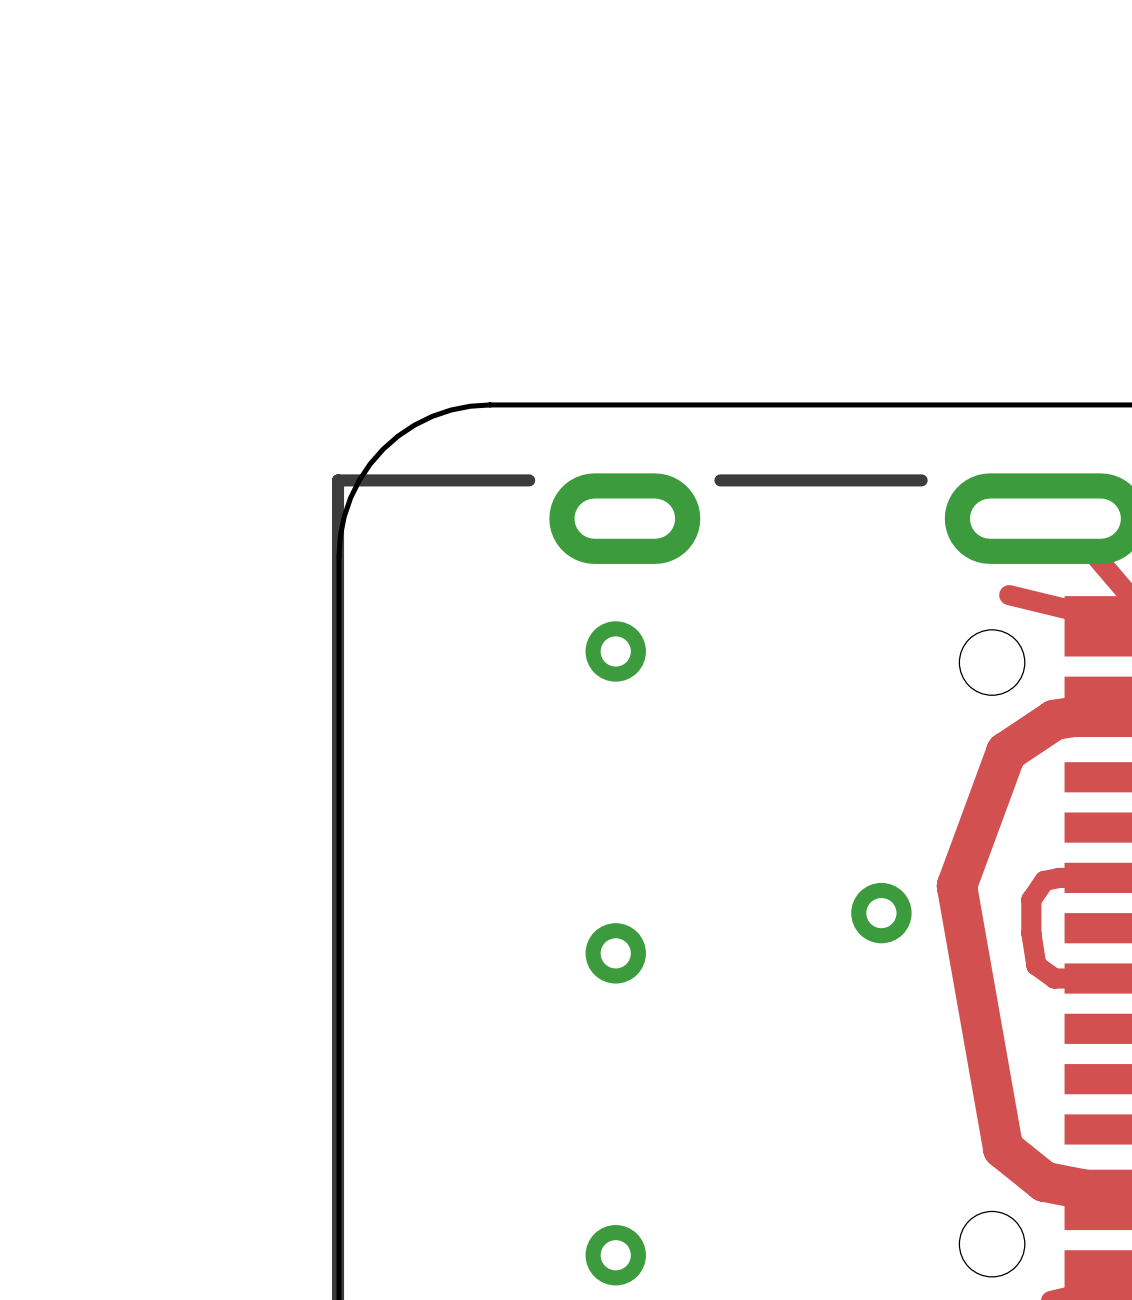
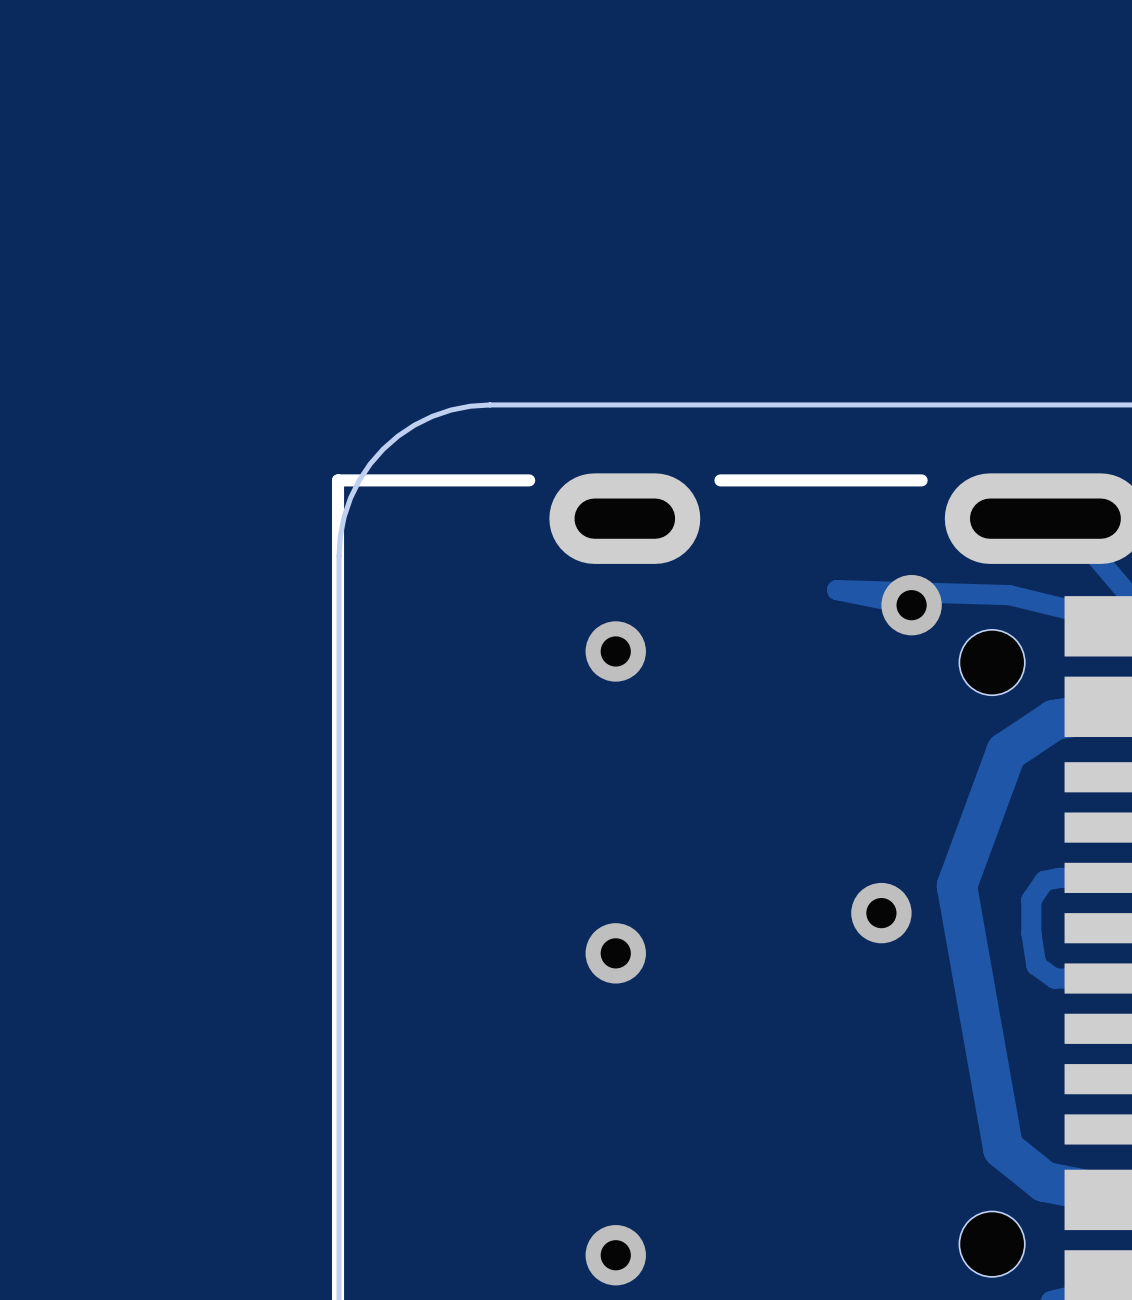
track: none -> (1009, 595) (837, 590) (911, 605)
via: none -> (911, 605)

